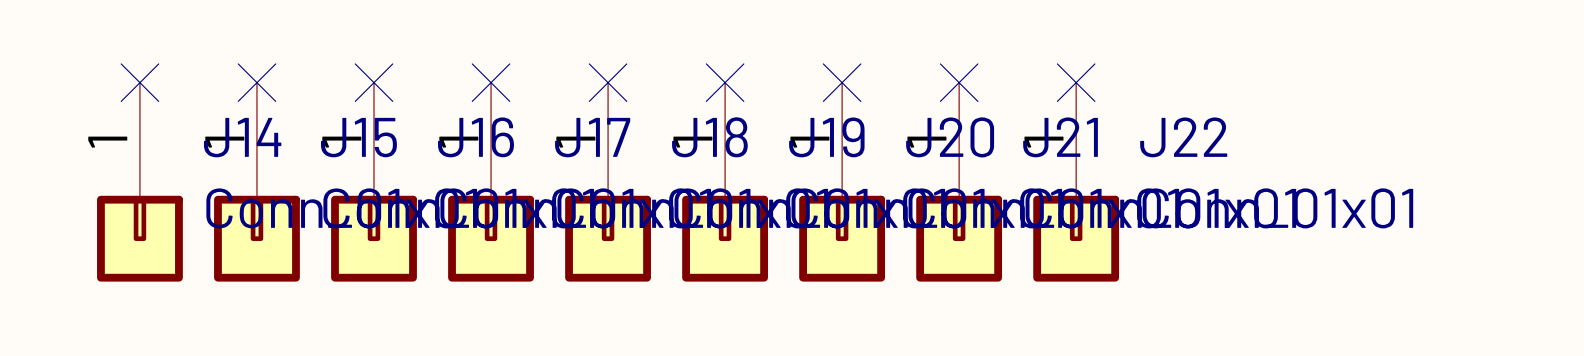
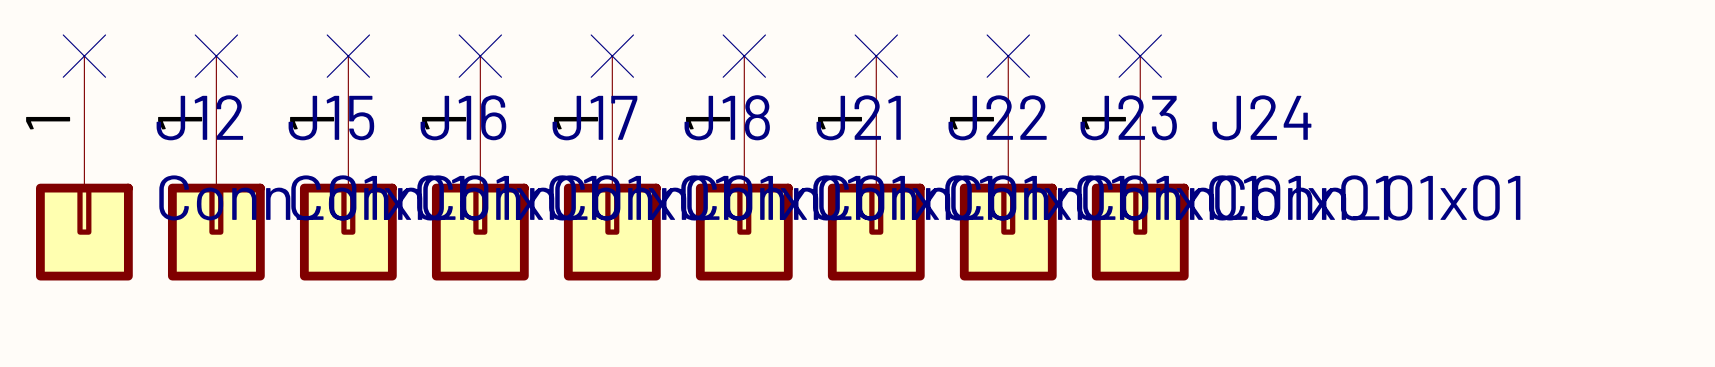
J14 name: J14 (242, 137) -> J12 (199, 117)
J19 name: J19 (826, 137) -> J21 (858, 117)
J20 name: J20 (950, 137) -> J22 (997, 117)
J21 name: J21 (1060, 137) -> J23 (1128, 117)
J22 name: J22 (1183, 137) -> J24 (1261, 117)

